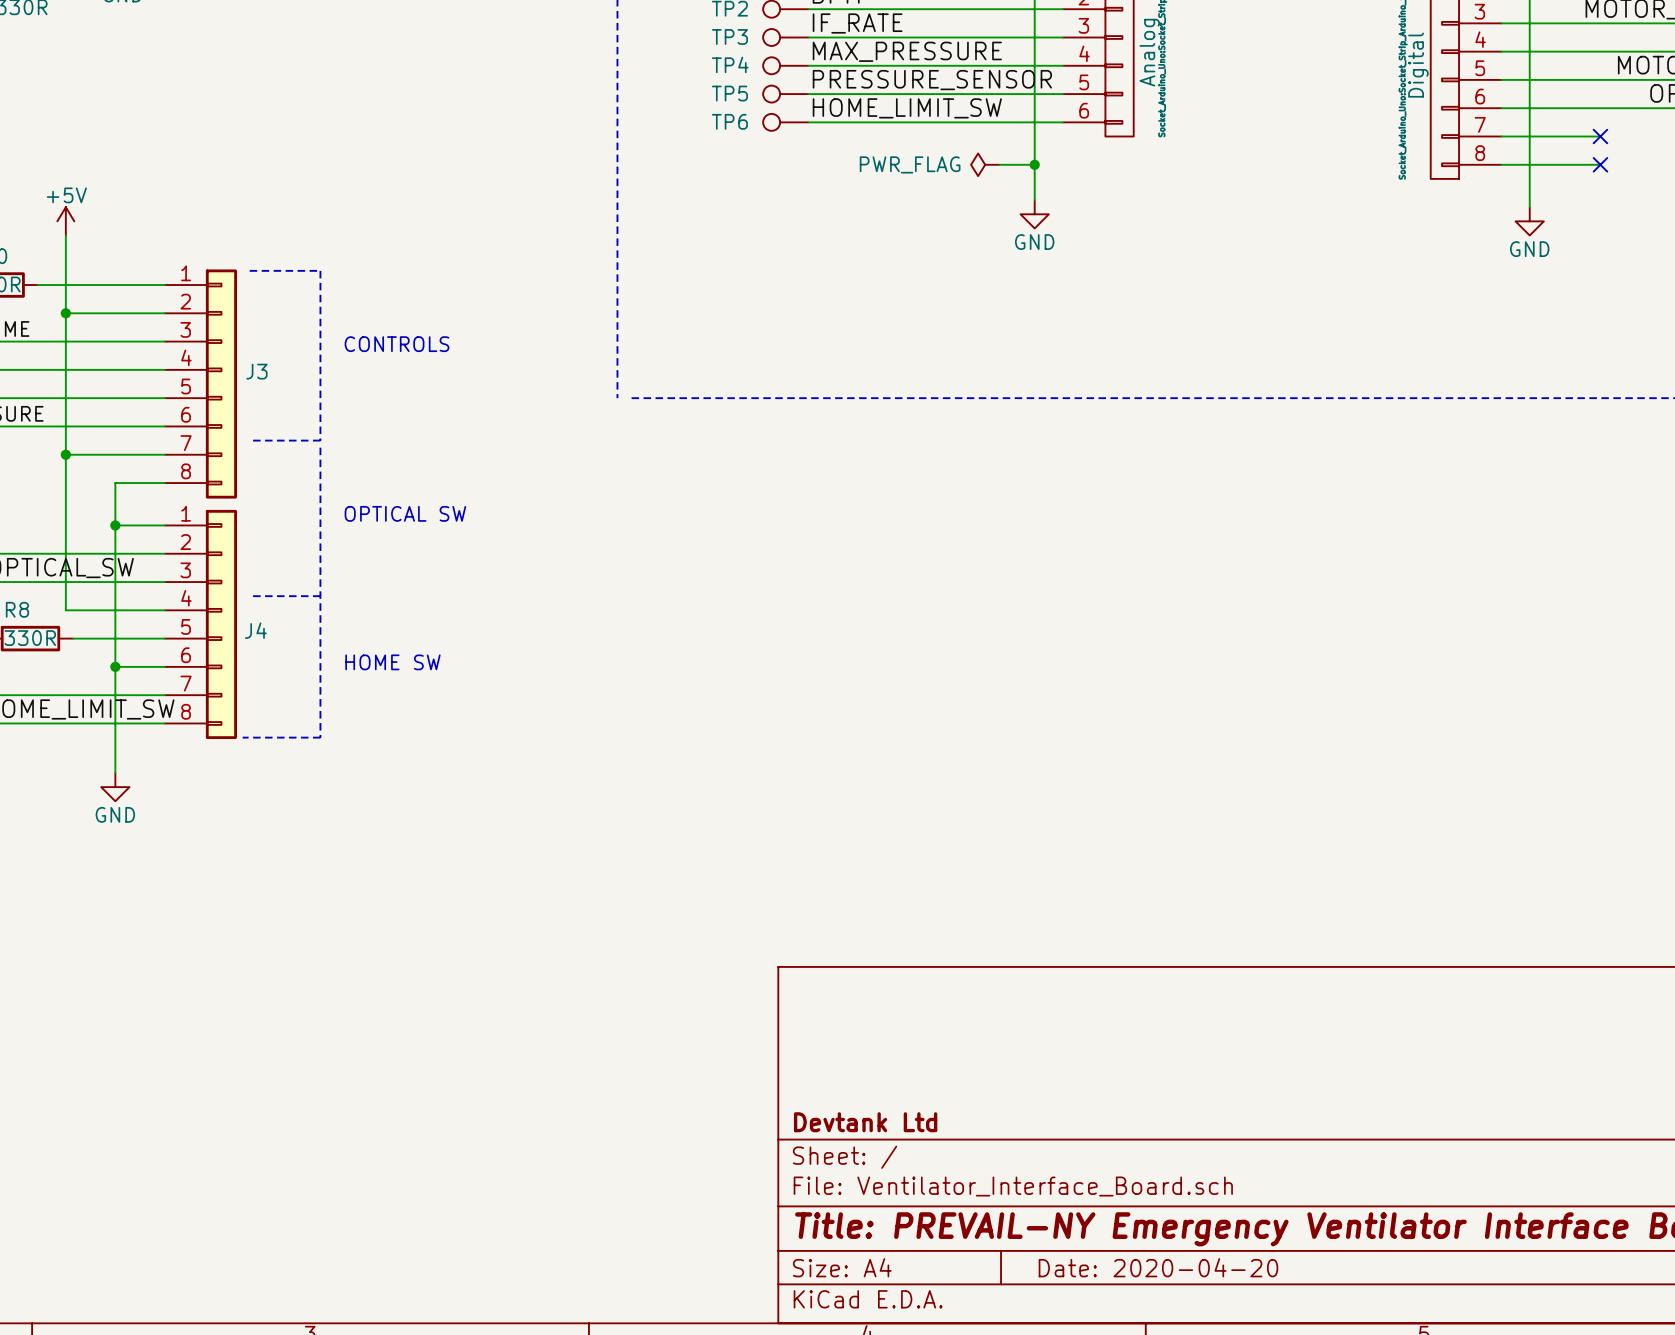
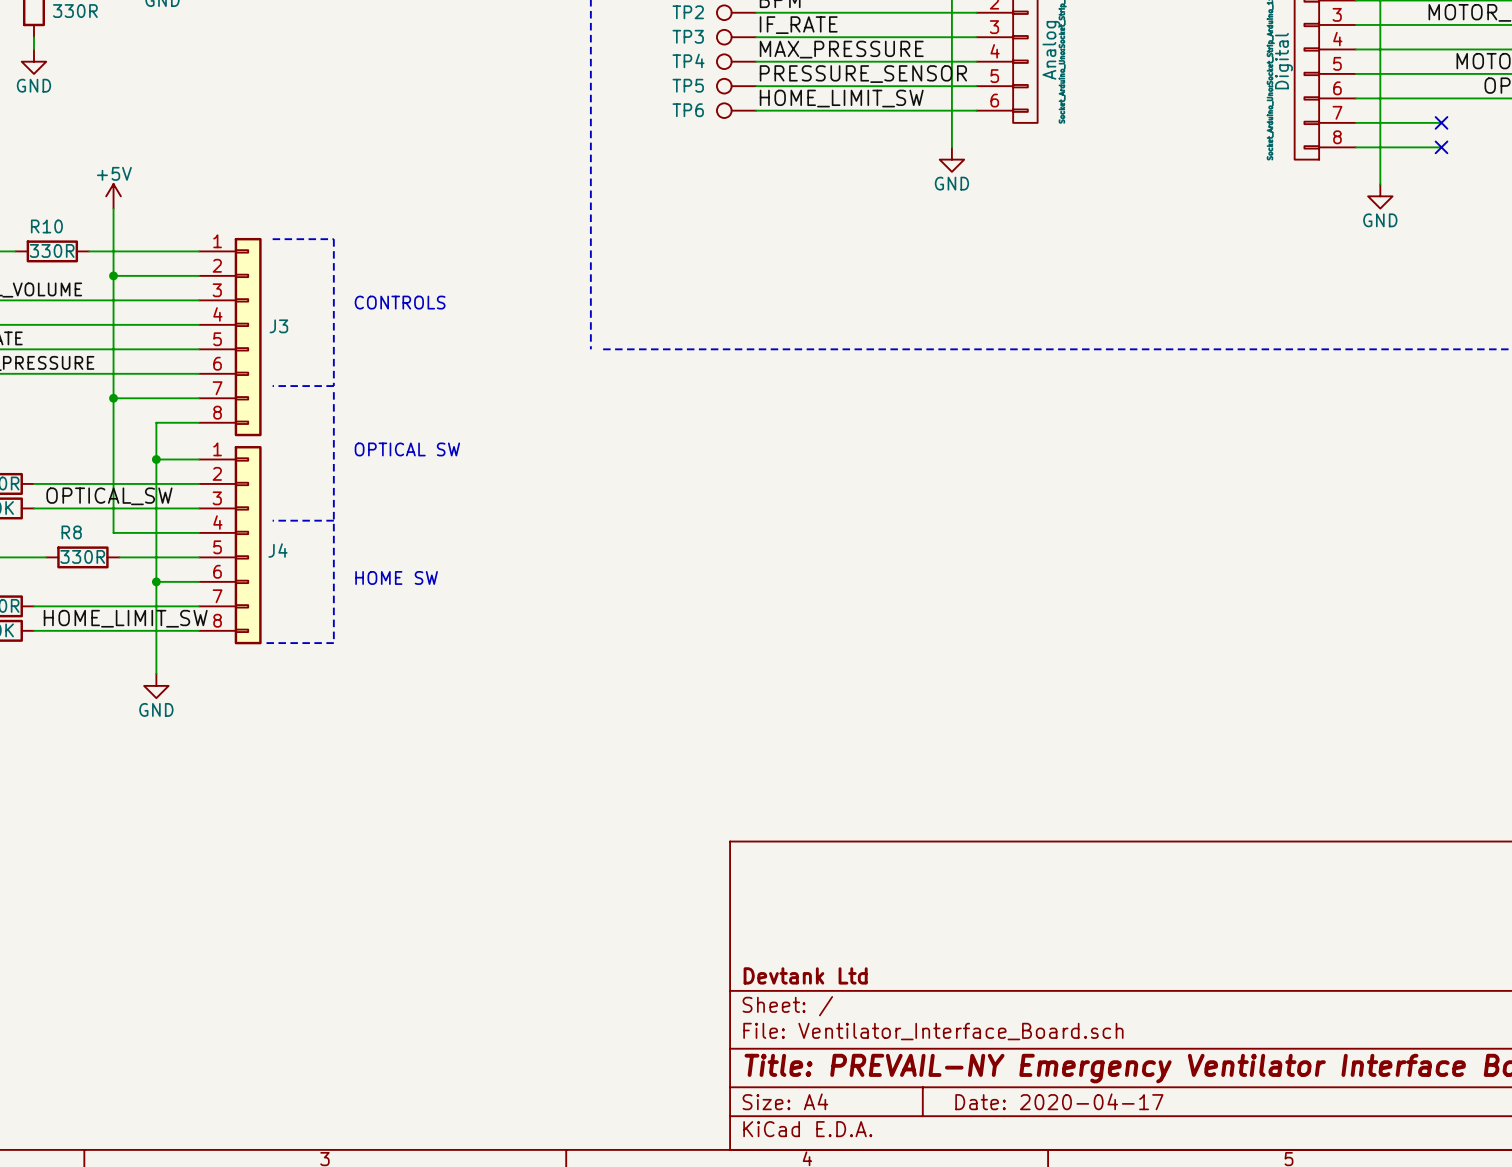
power symbol: PWR_FLAG (985, 164) -> none
wire: (999, 164) (1034, 164) (1034, 200) -> none
junction: (1034, 164) -> none
power symbol position: GND (1034, 214) -> GND (951, 159)
title block: Date: 2020-04-20 (1158, 1267) -> Date: 2020-04-17 (1059, 1101)

